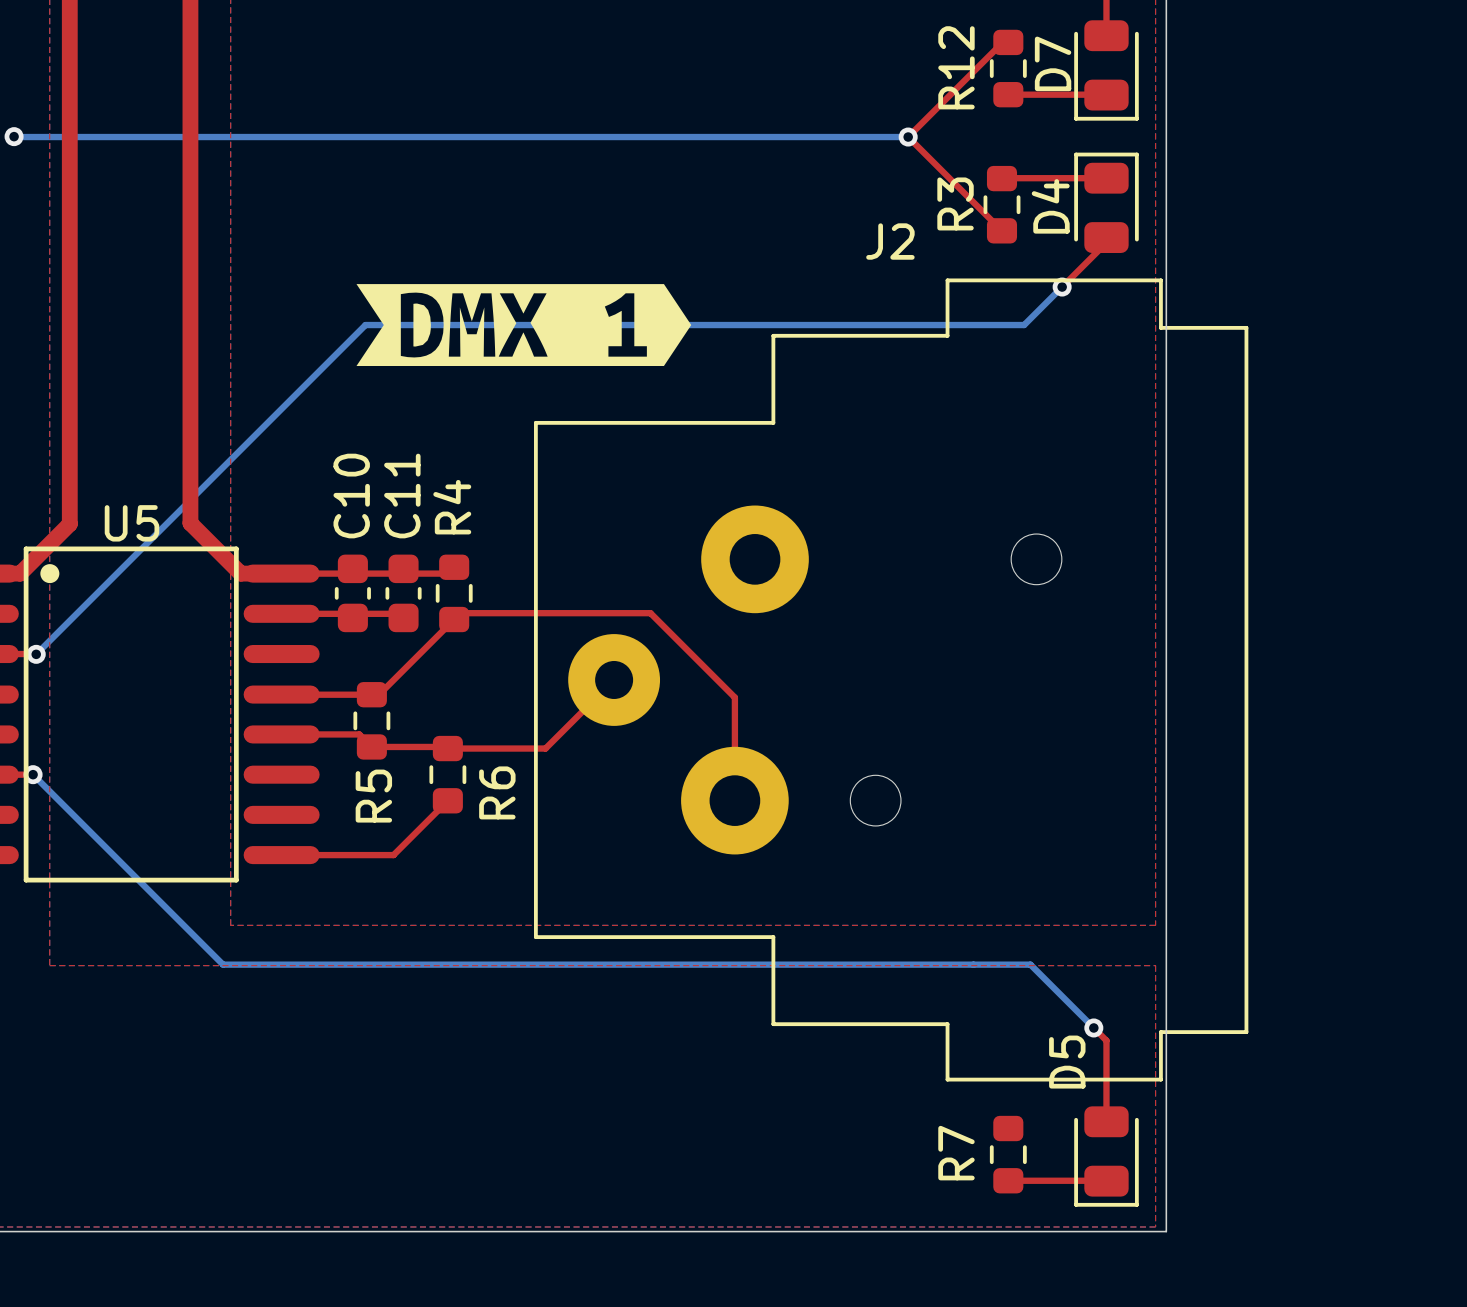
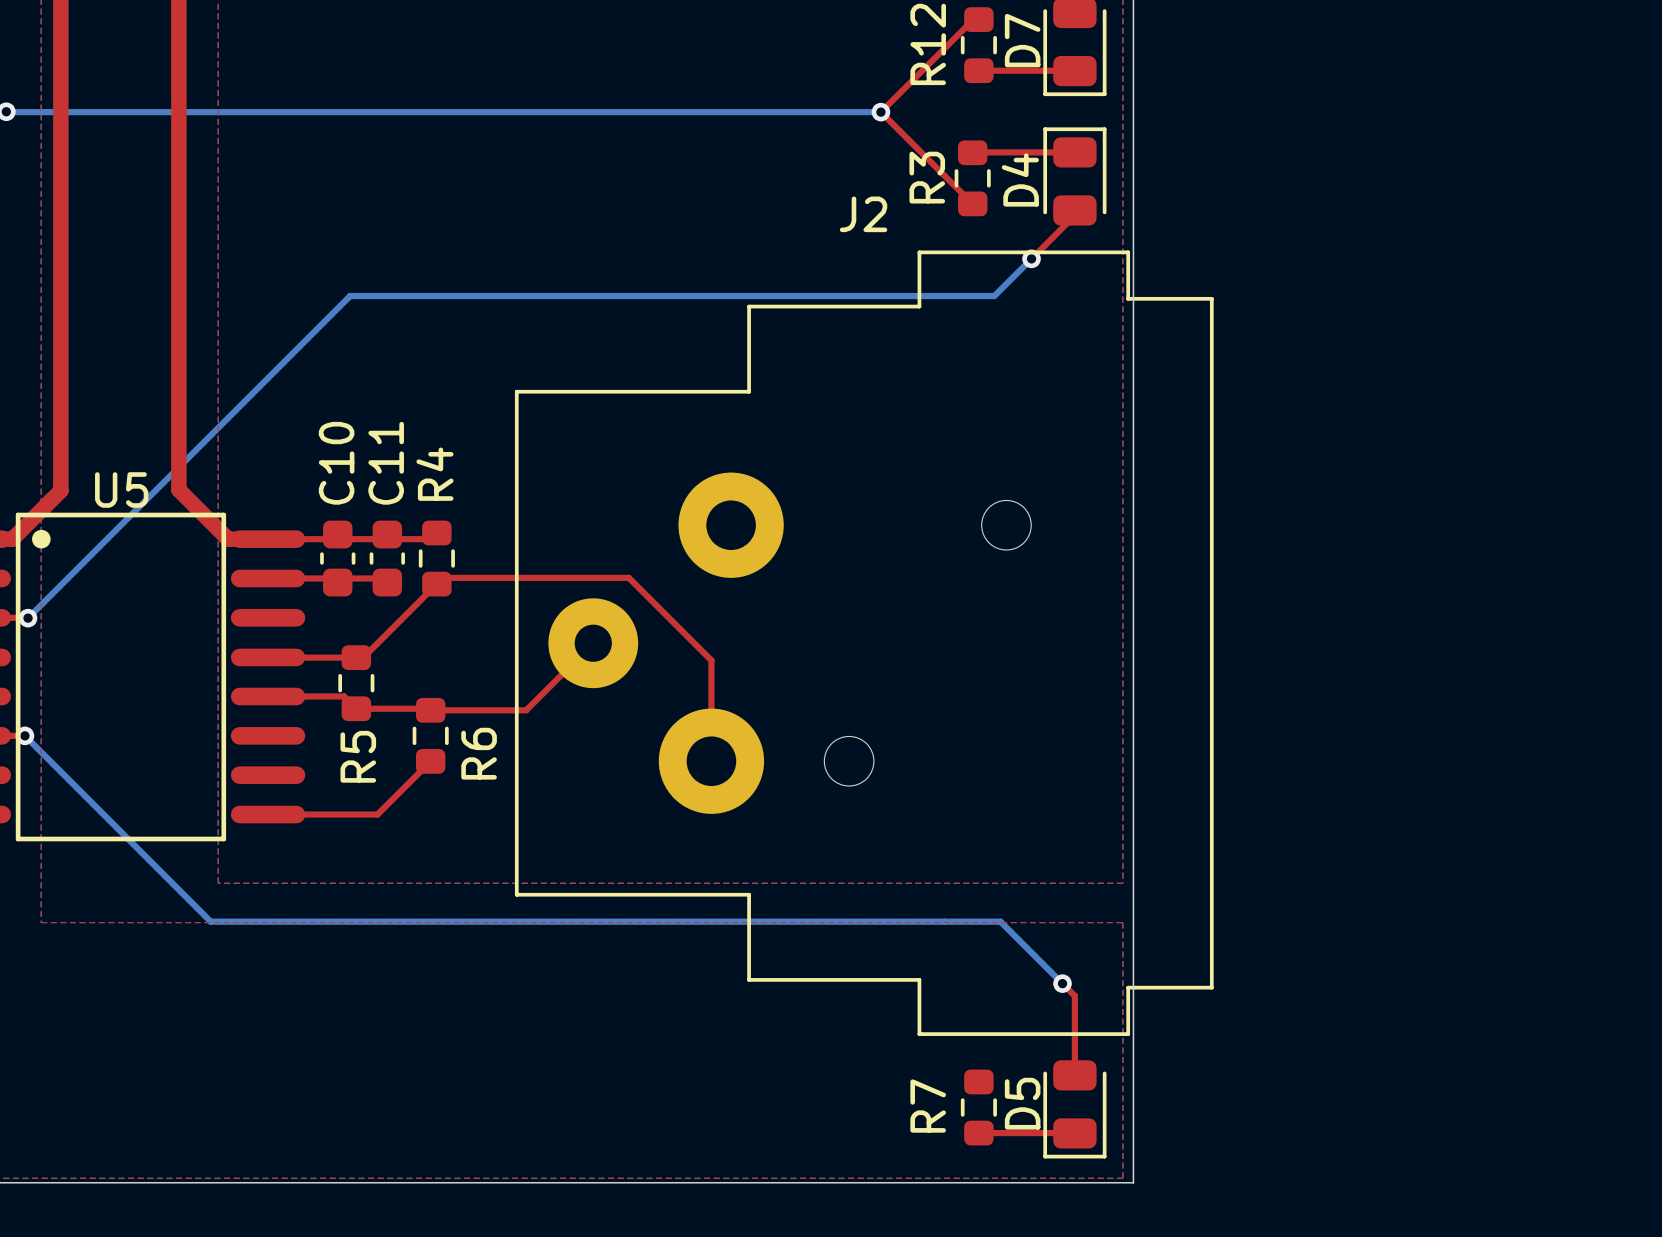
drawing: [356, 284, 692, 366] -> none
D5 name position: D5 (1067, 1062) -> D5 (1022, 1103)

